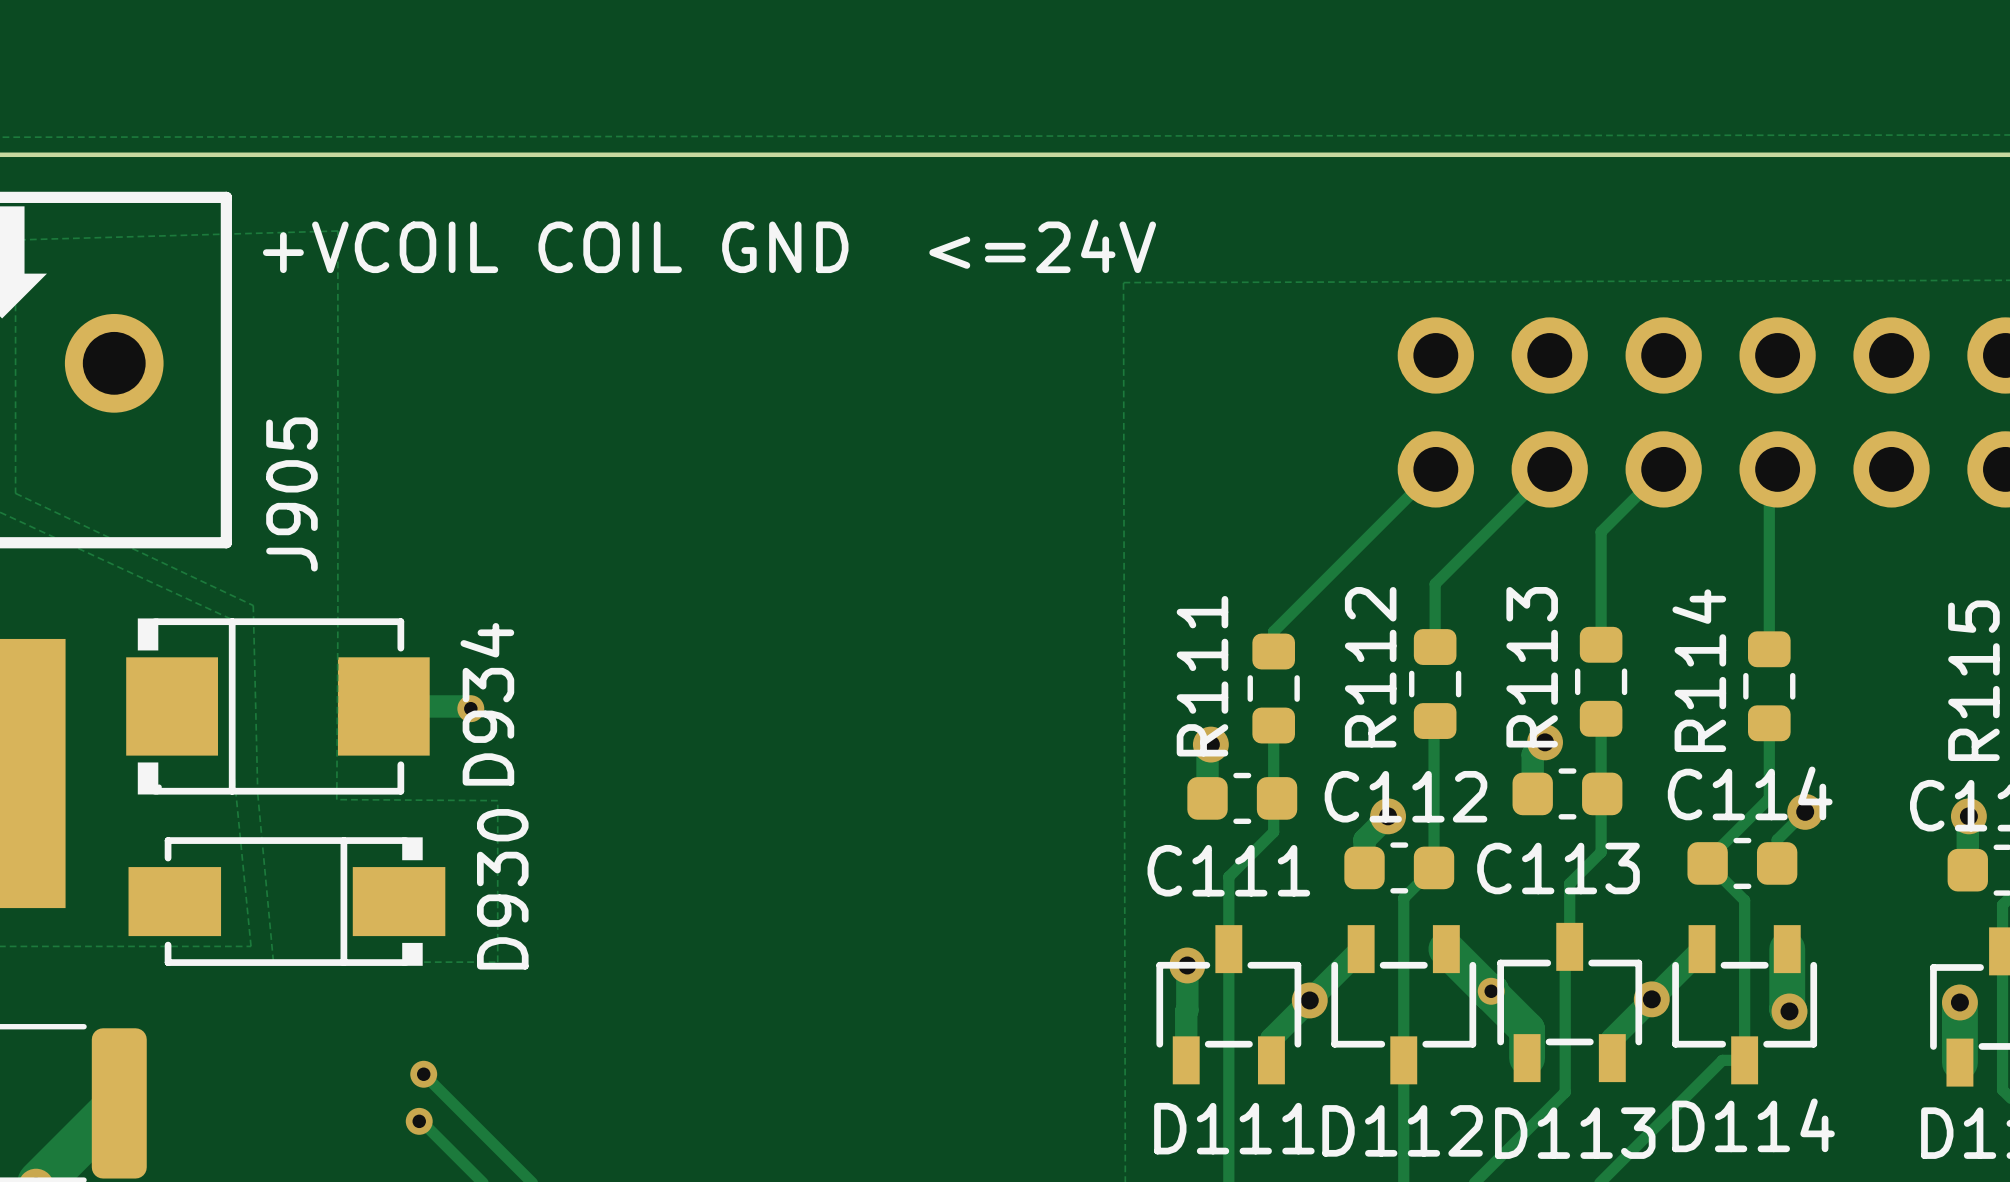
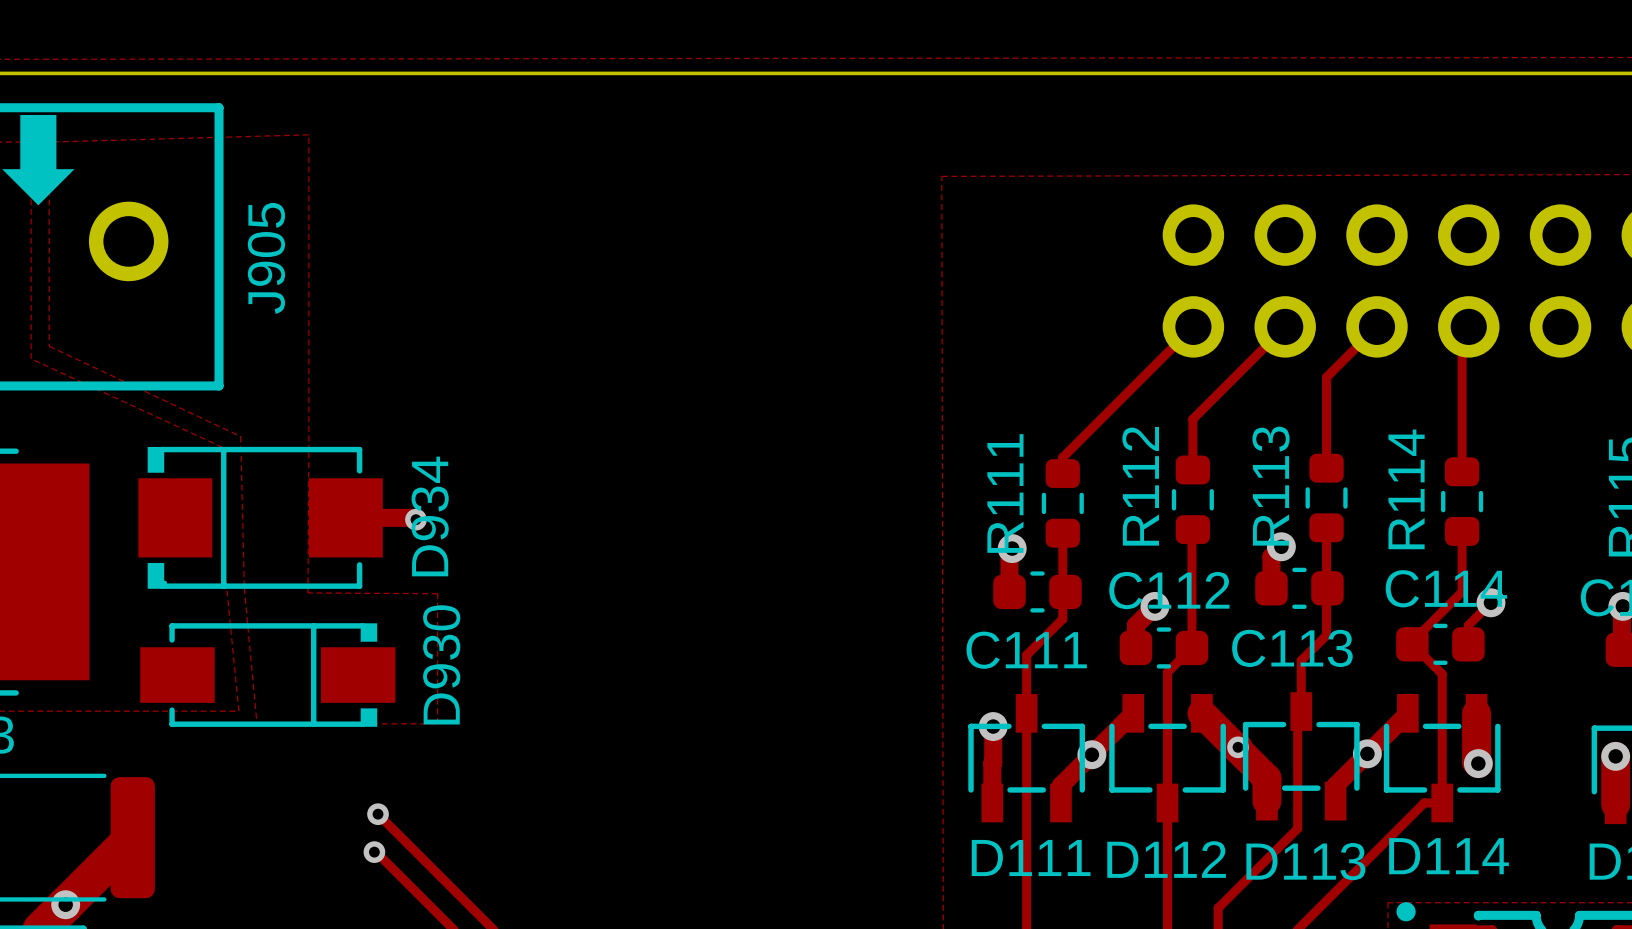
text: +VCOIL COIL GND <=24V (709, 246) -> none
J905 name position: J905 (291, 494) -> J905 (266, 258)

